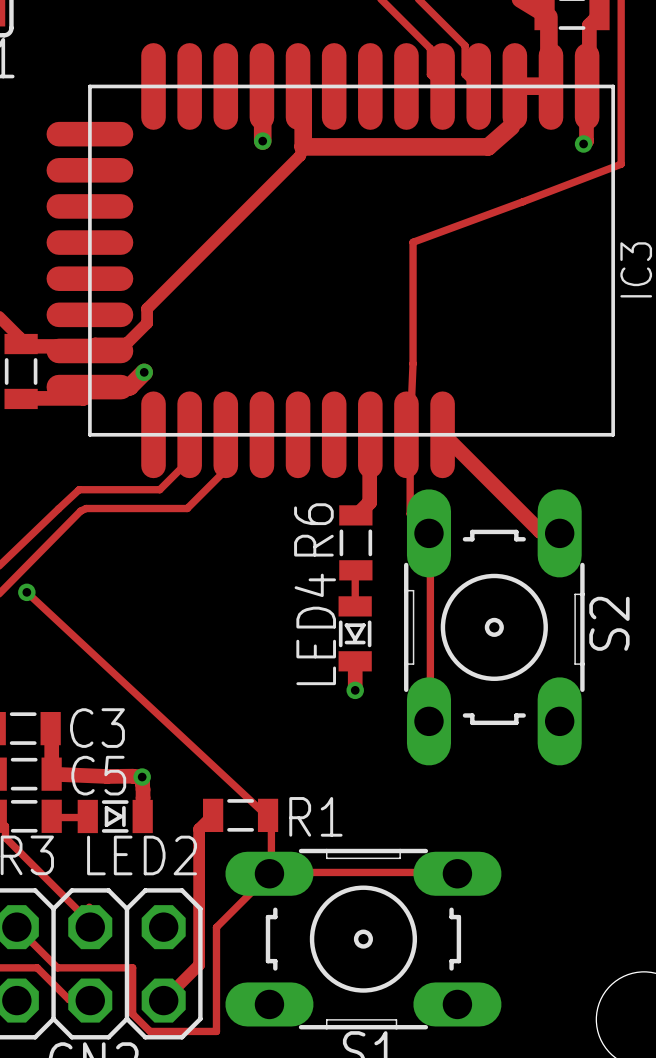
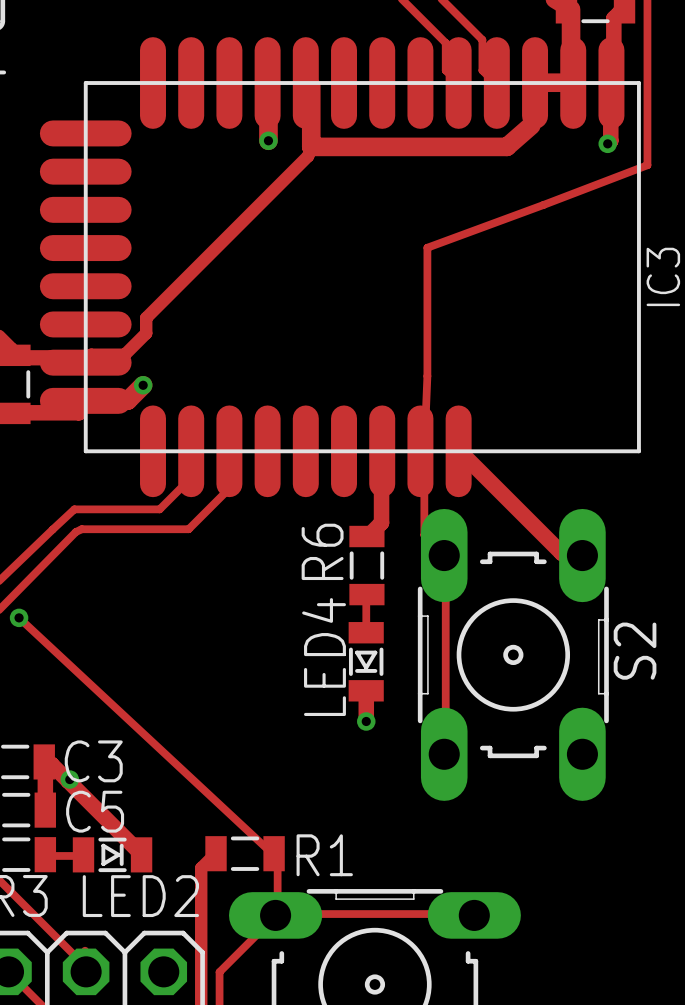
track: none -> (44, 761) (51, 764) (140, 852)
track: (51, 774) (142, 777) (142, 816) -> none
via position: (142, 777) -> (69, 779)

